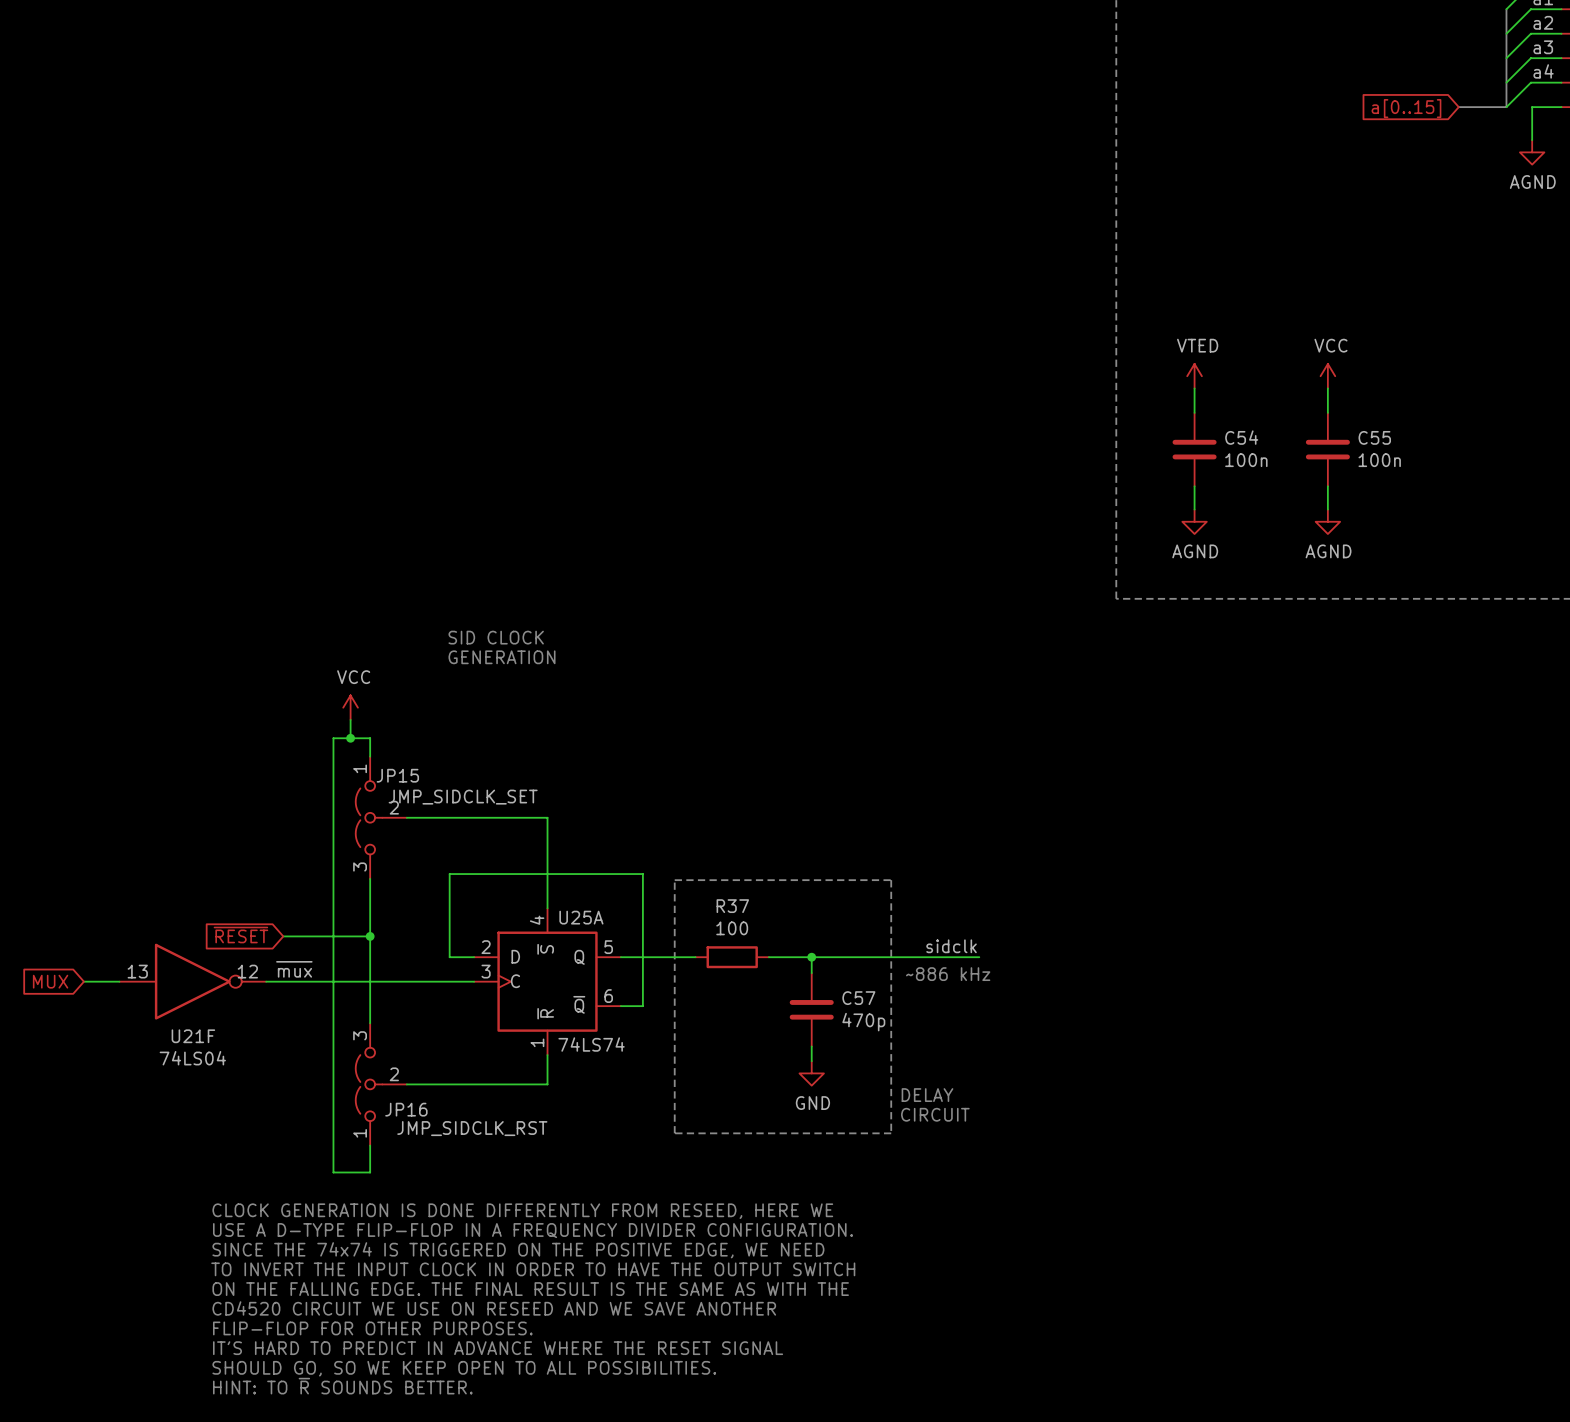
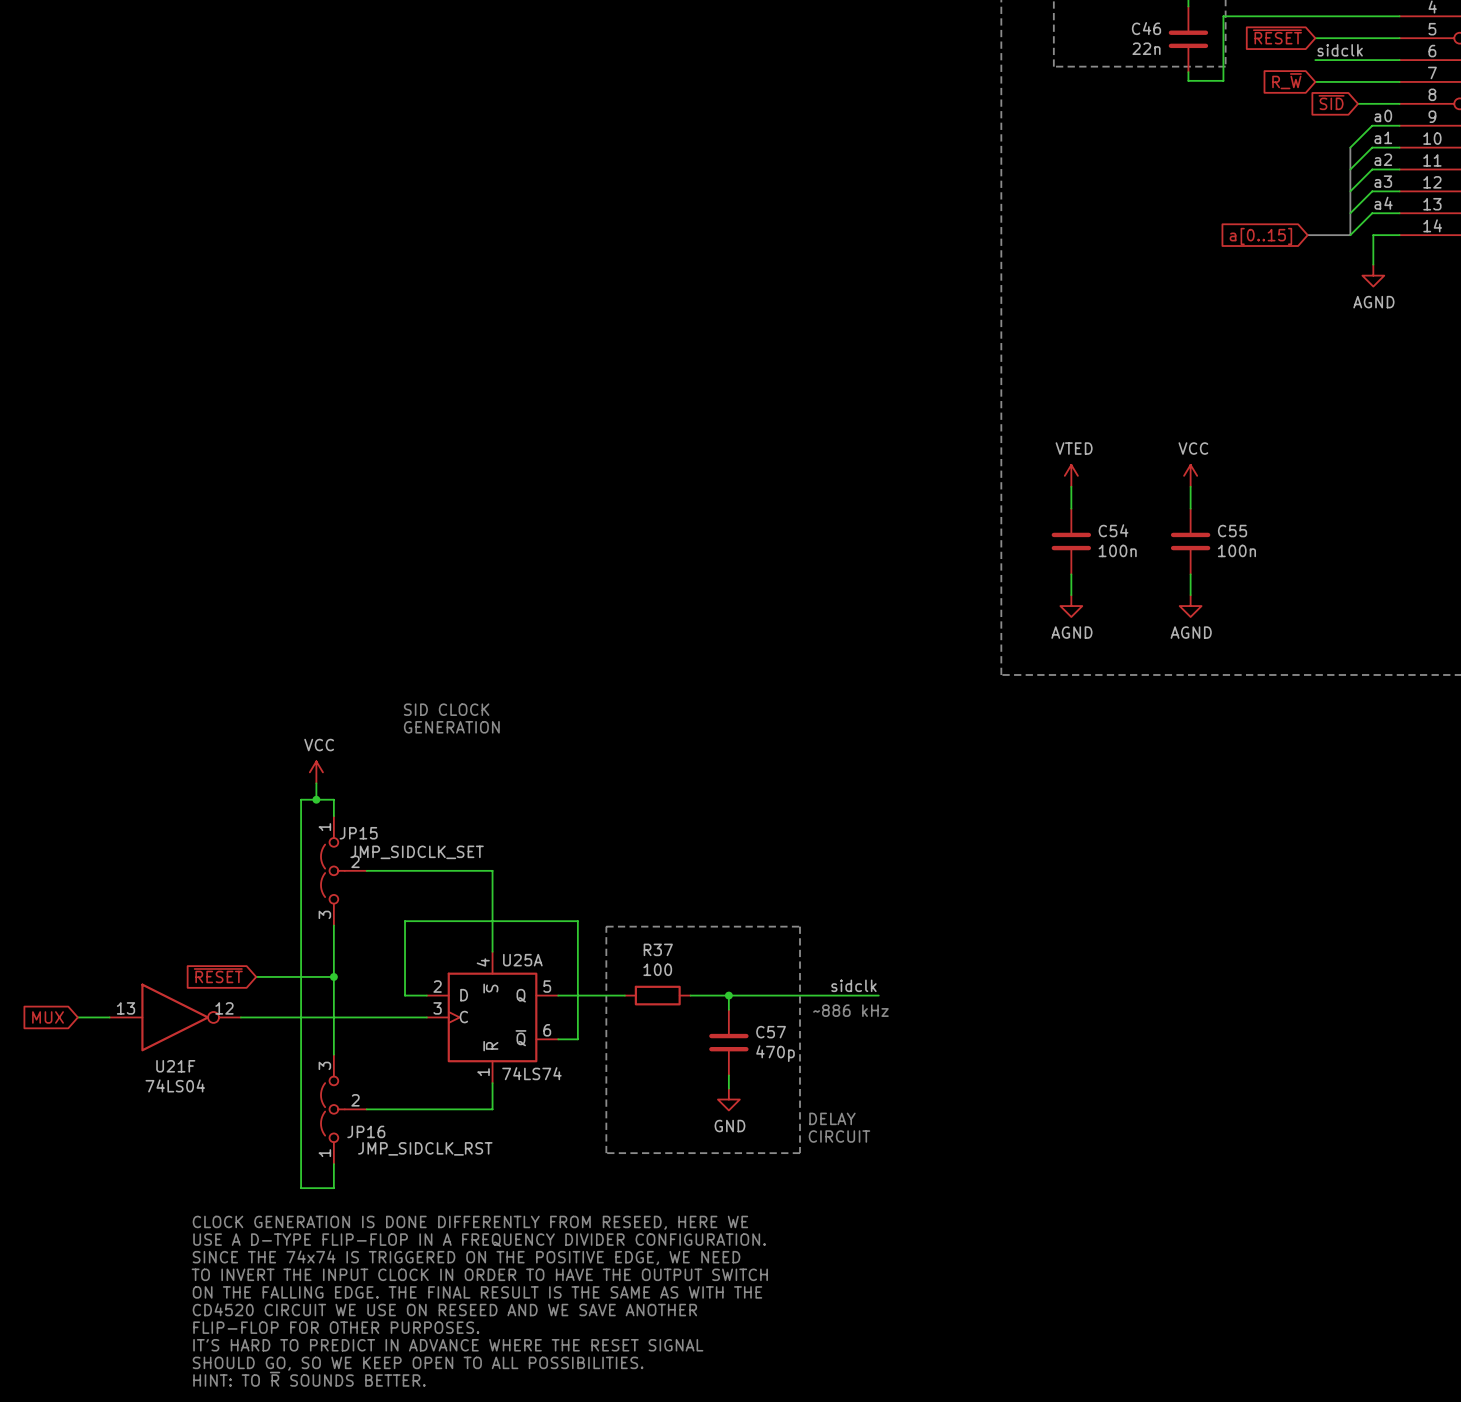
label: ~{mux} (294, 969) -> none

